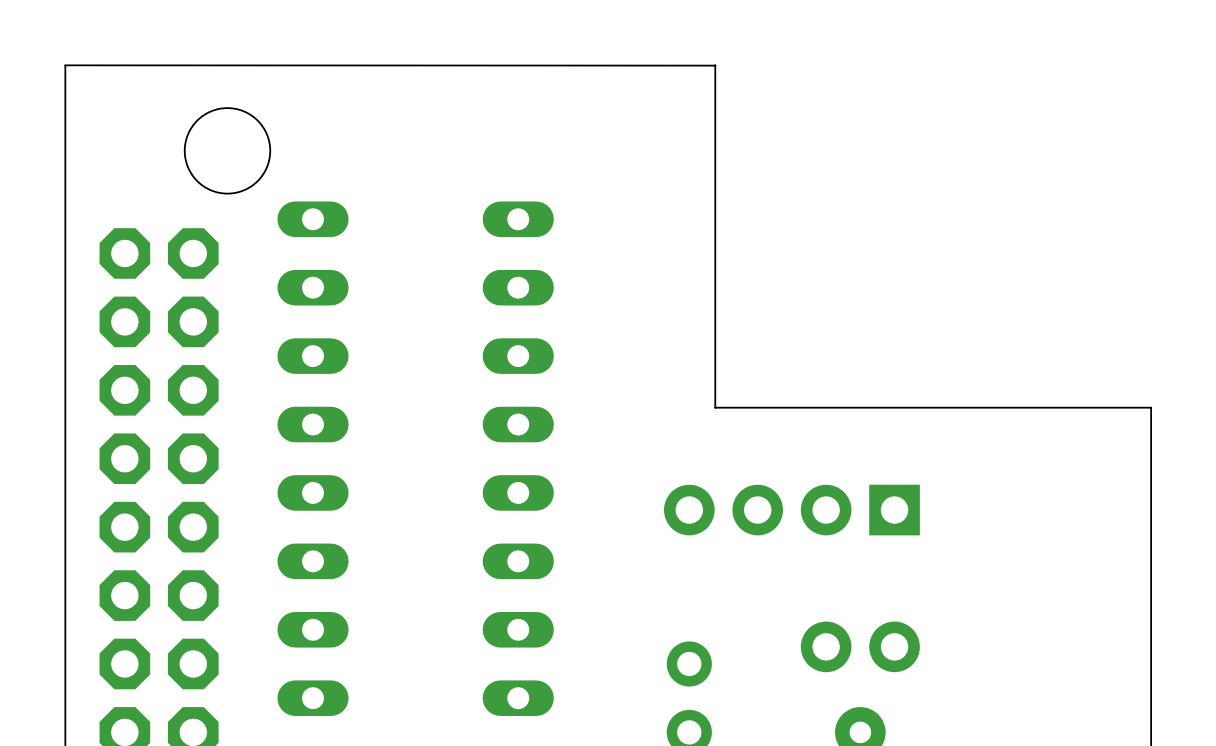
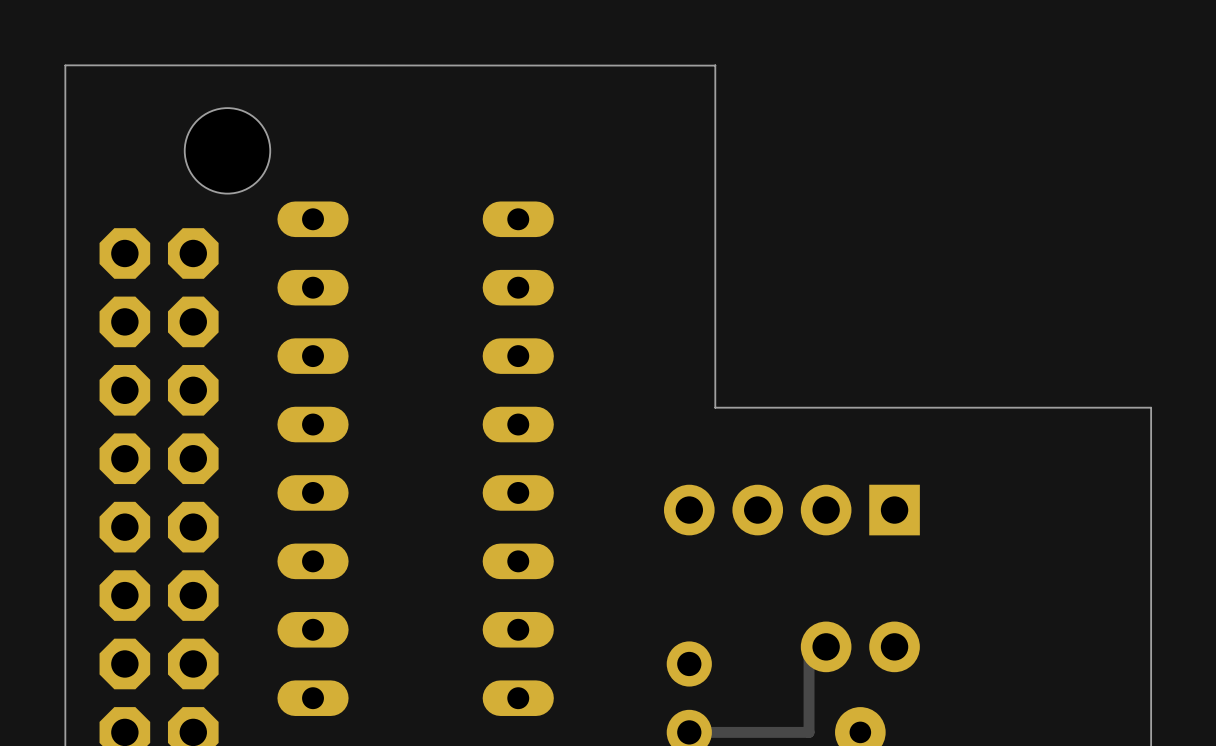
track: none -> (826, 646) (809, 646) (809, 732) (689, 732)

